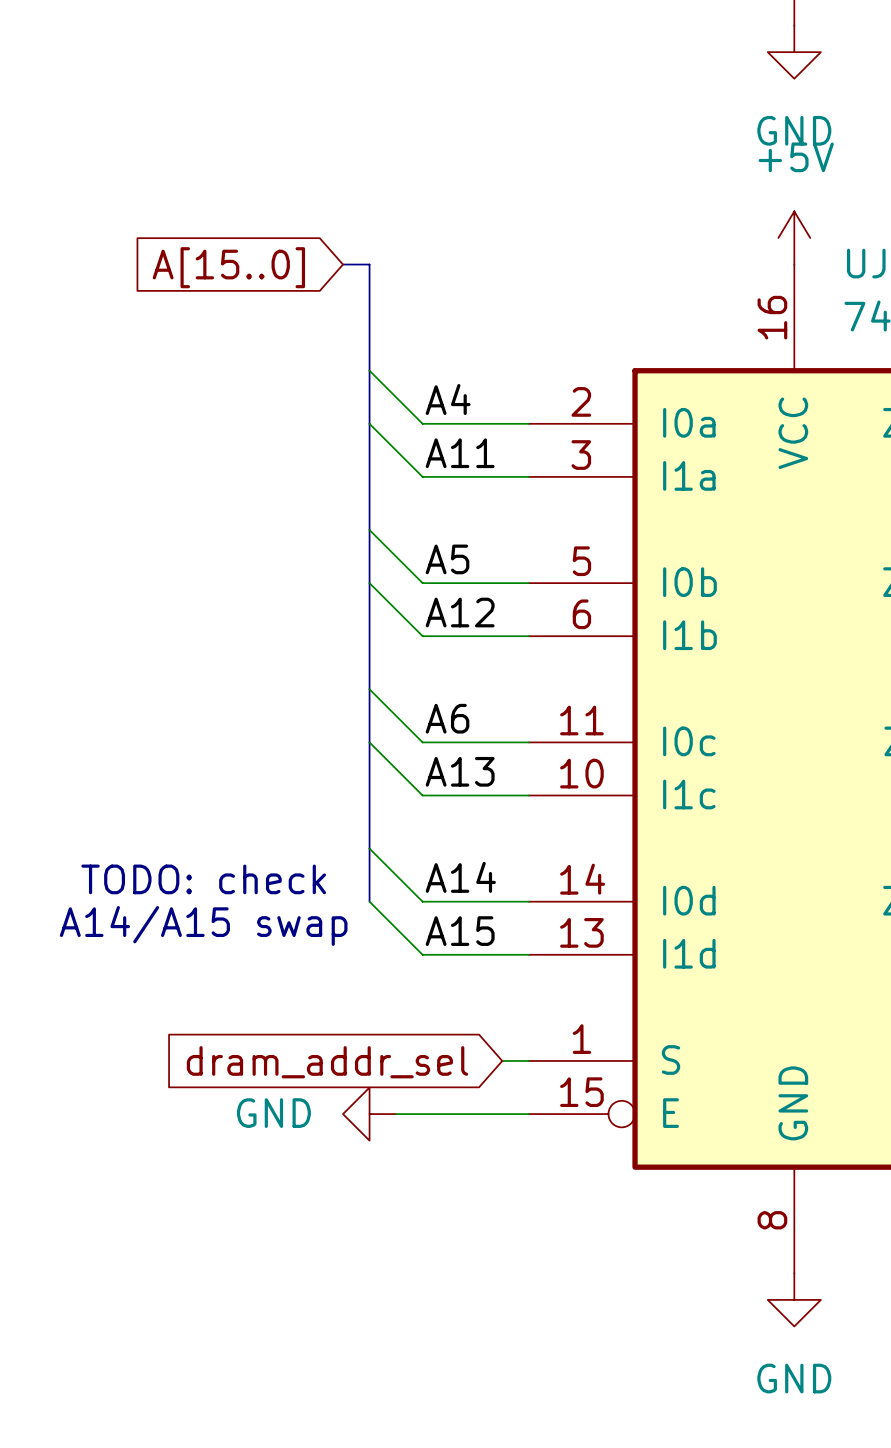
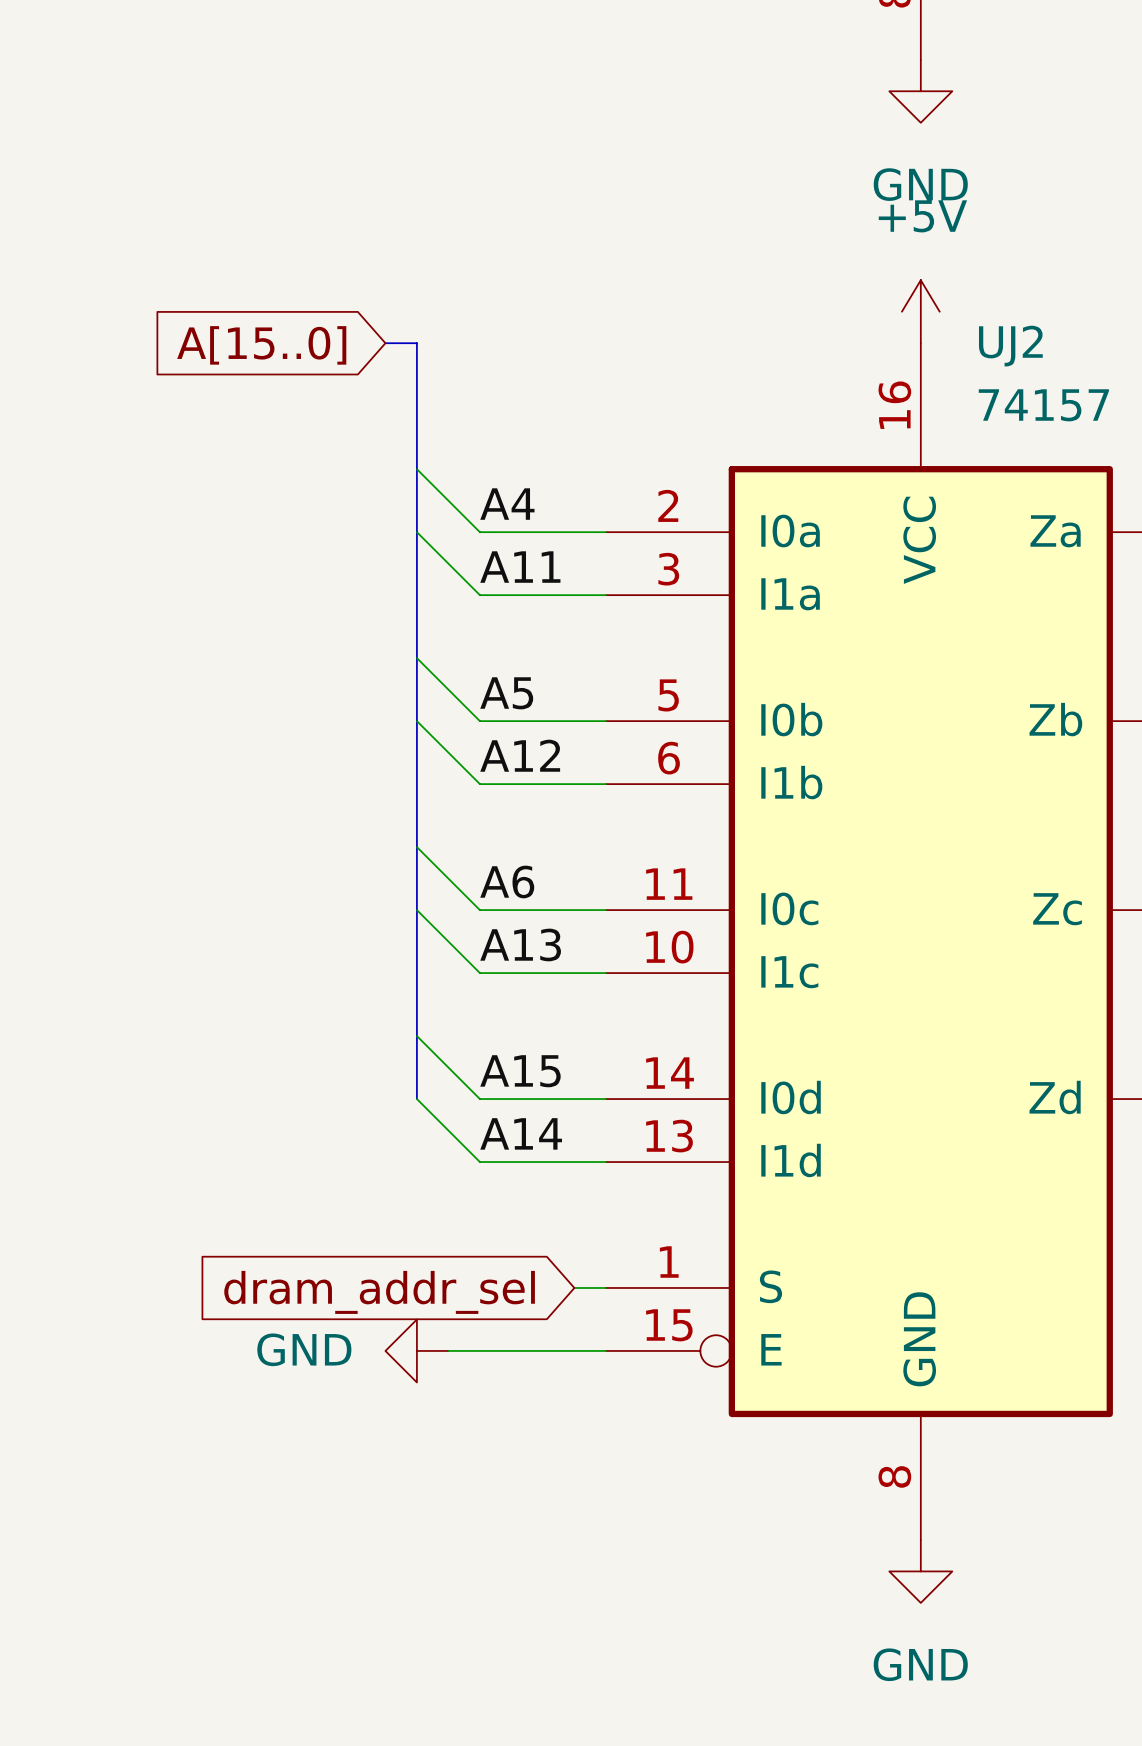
label: A14 (460, 877) -> A15 (520, 1071)
text: TODO: check (203, 879) -> none
text: A14/A15 swap (203, 925) -> none
label: A15 (460, 931) -> A14 (521, 1133)

